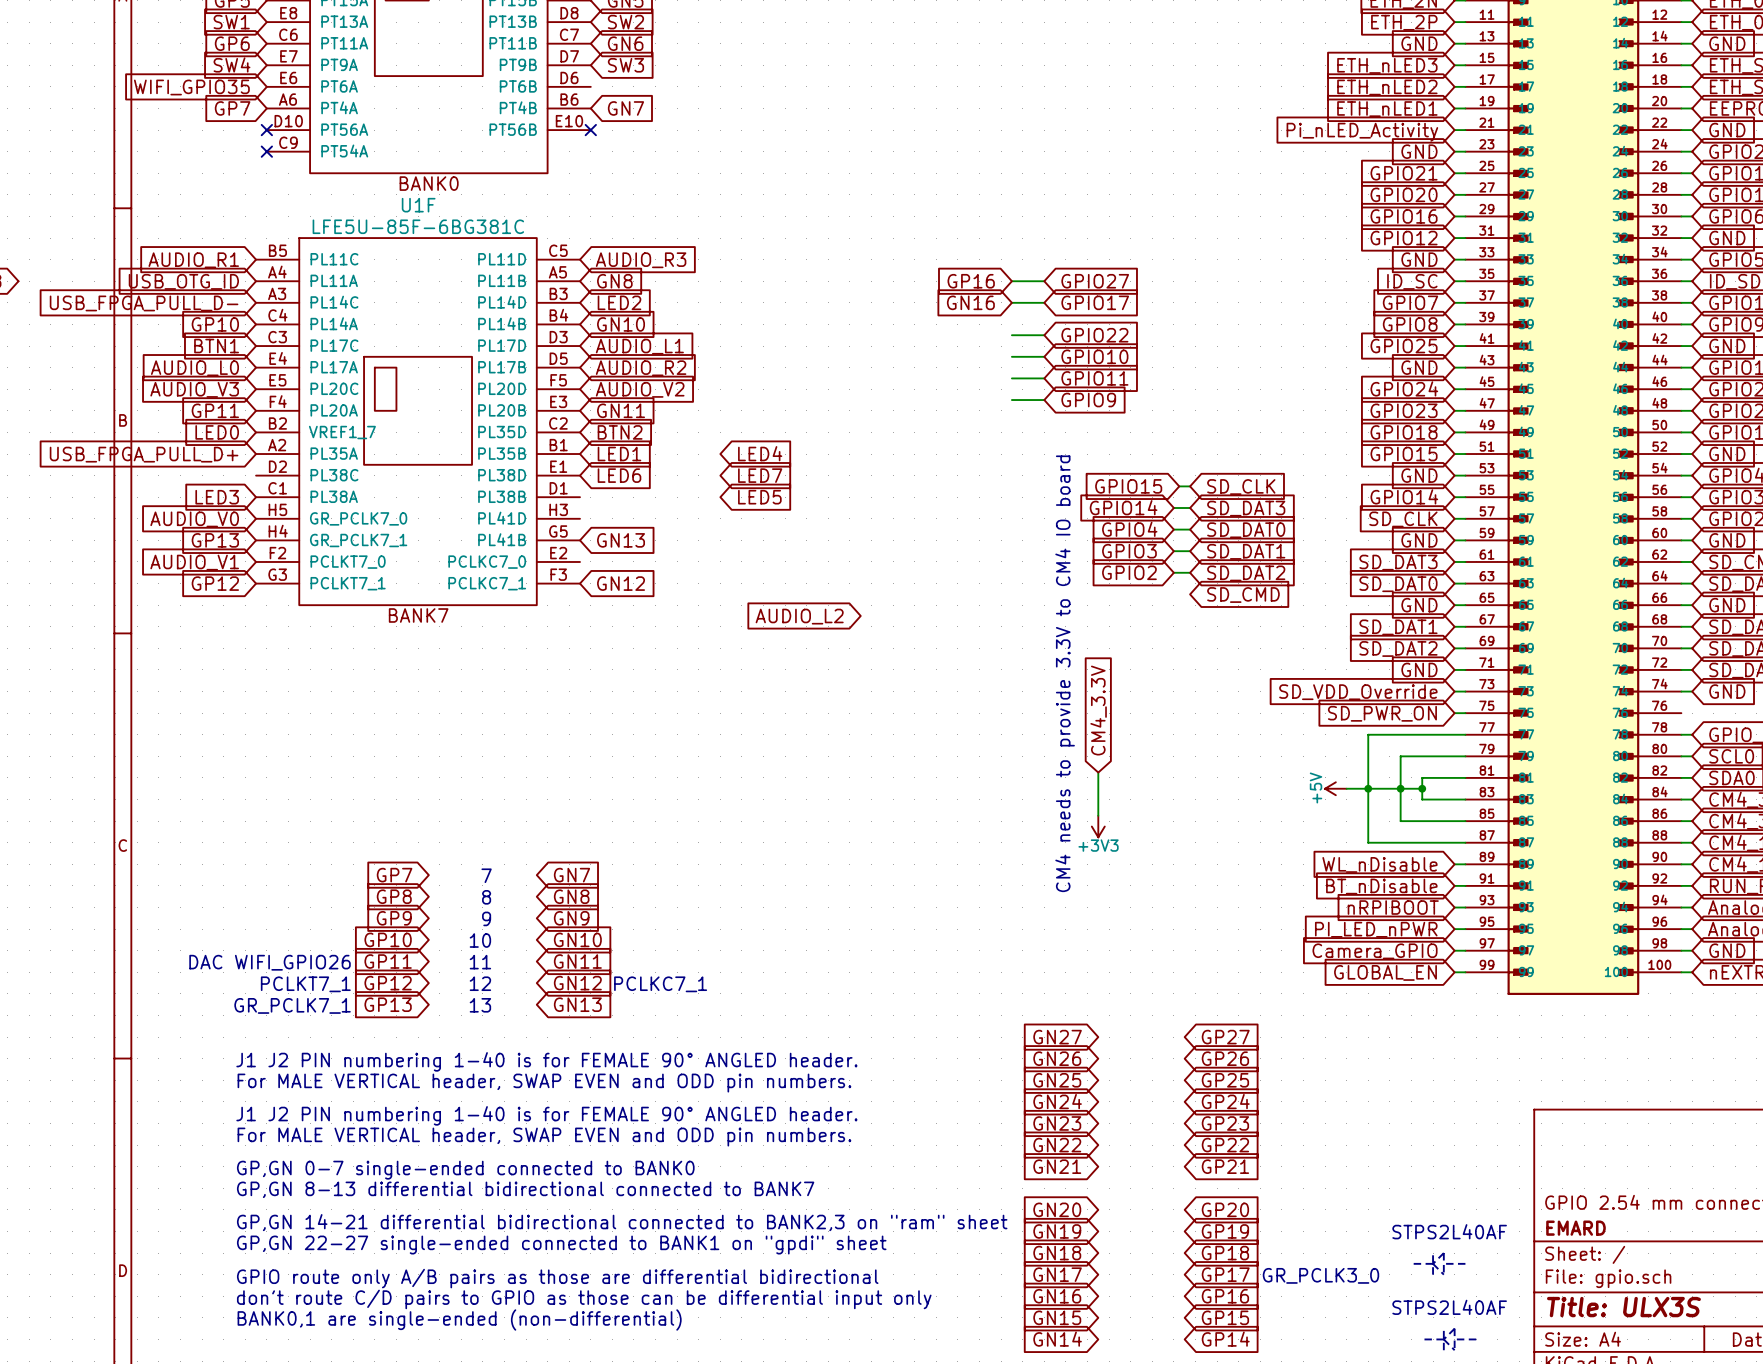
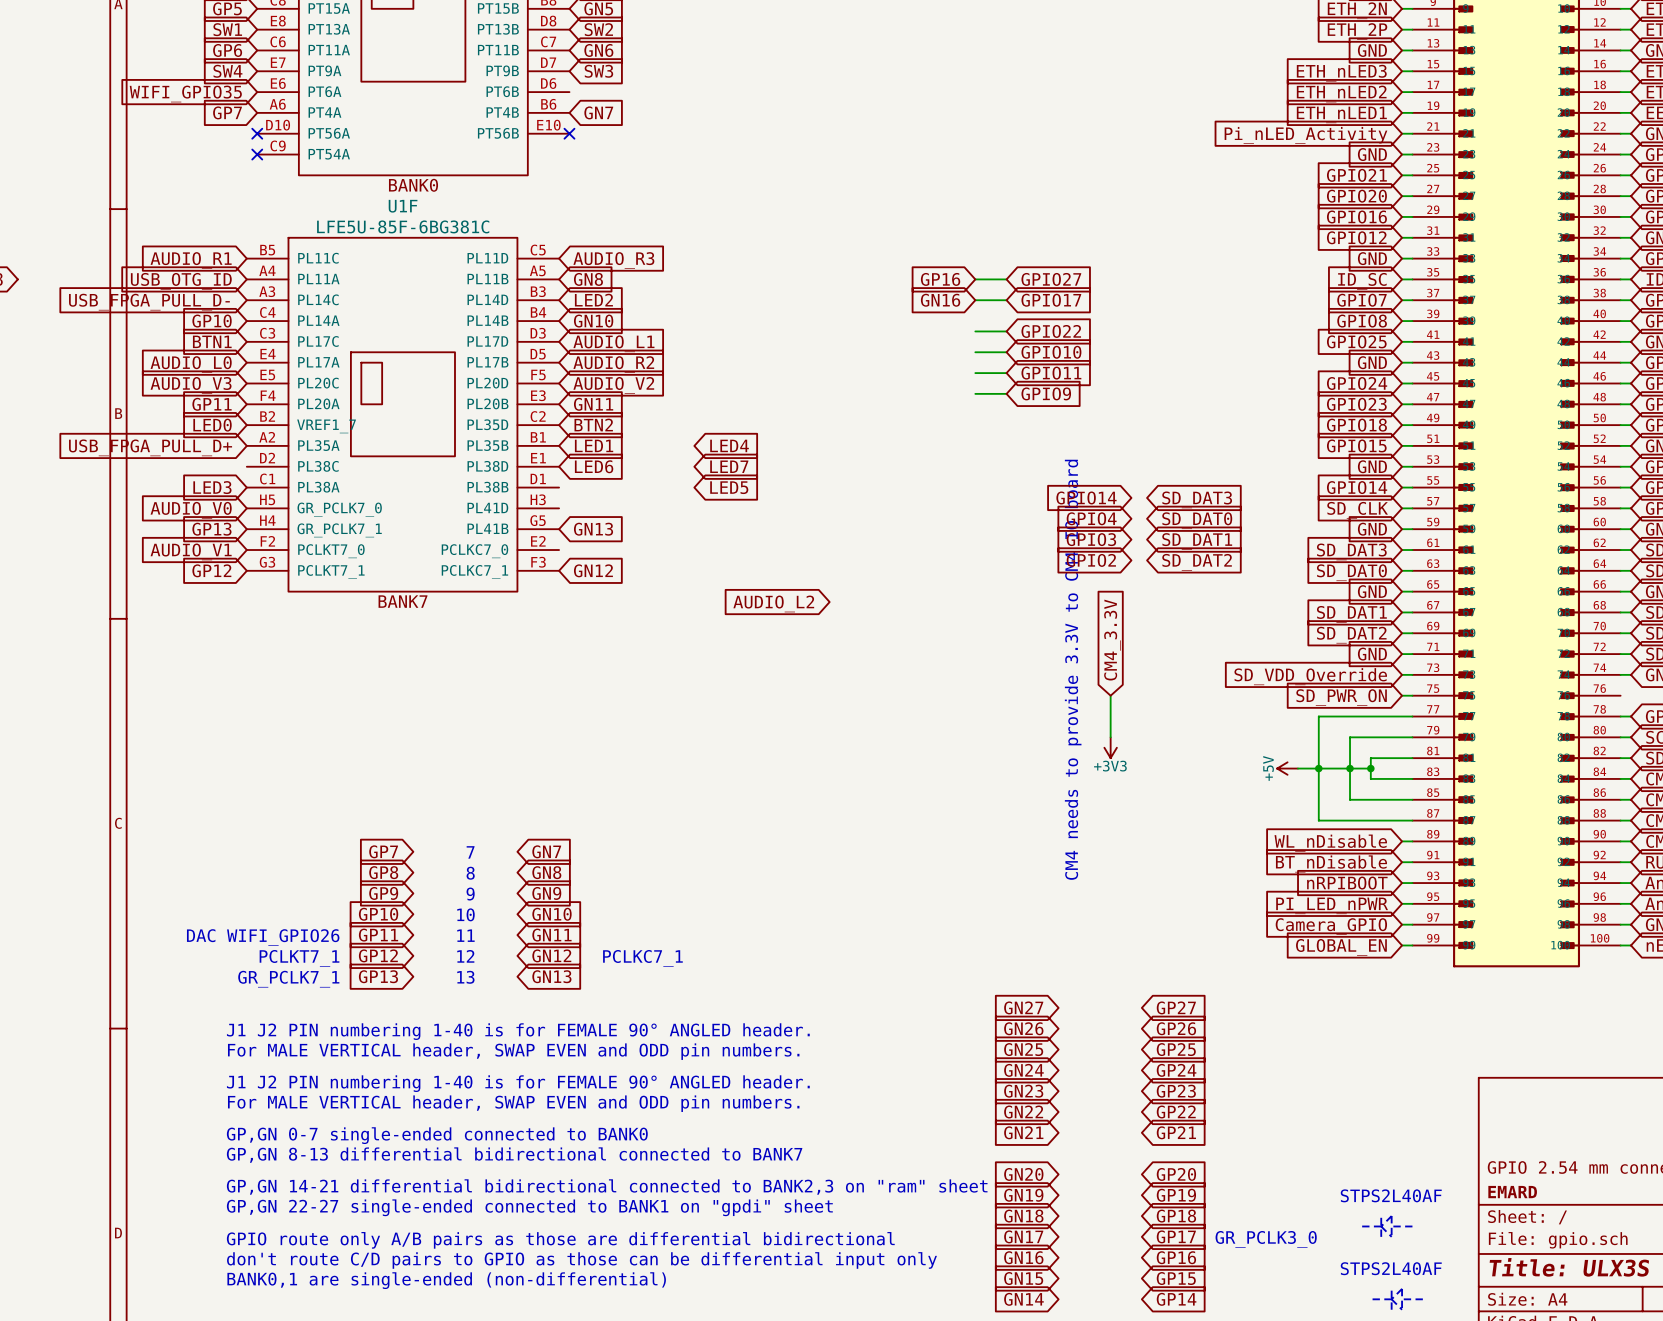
global label: GPIO15 (1128, 486) -> none
wire: (1179, 486) (1190, 486) -> none
global label: SD_CLK (1241, 487) -> none
wire: (1173, 508) (1190, 508) -> none
wire: (1173, 529) (1190, 529) -> none
wire: (1173, 551) (1190, 551) -> none
wire: (1173, 572) (1190, 572) -> none
global label: SD_CMD (1243, 595) -> none
text position: CM4 needs to provide 3.3V to CM4 IO board (1065, 673) -> CM4 needs to provide 3.3V to CM4 IO board (1073, 669)
global label position: CM4_3.3V (1098, 710) -> CM4_3.3V (1112, 640)
wire: (1098, 772) (1098, 815) -> (1110, 695) (1110, 737)
power symbol position: +3V3 (1098, 826) -> +3V3 (1110, 747)

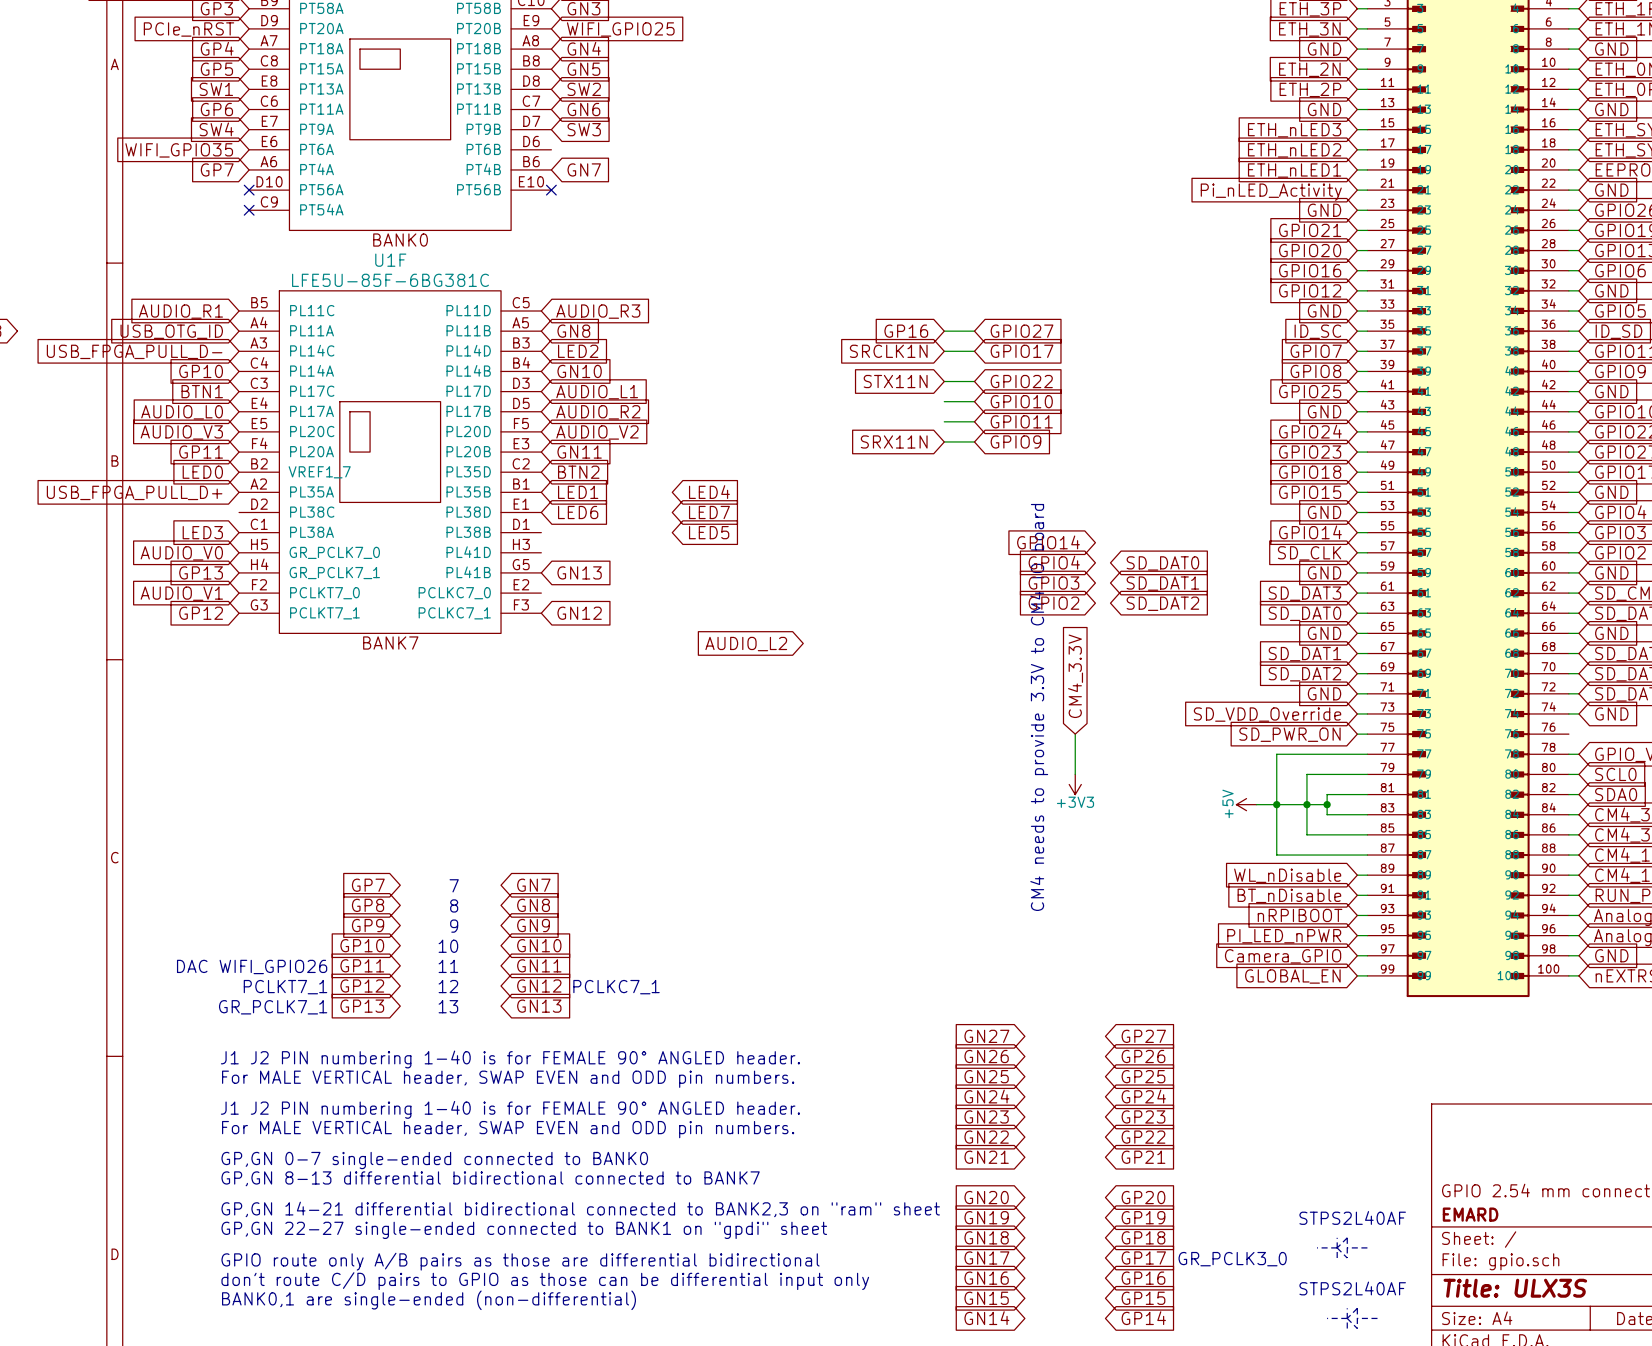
global label: GN16 (940, 300) -> SRCLK1N (888, 351)
global label: none -> STX11N (895, 381)
global label: none -> SRX11N (894, 441)
global label: SD_DAT3 (1197, 499) -> none

